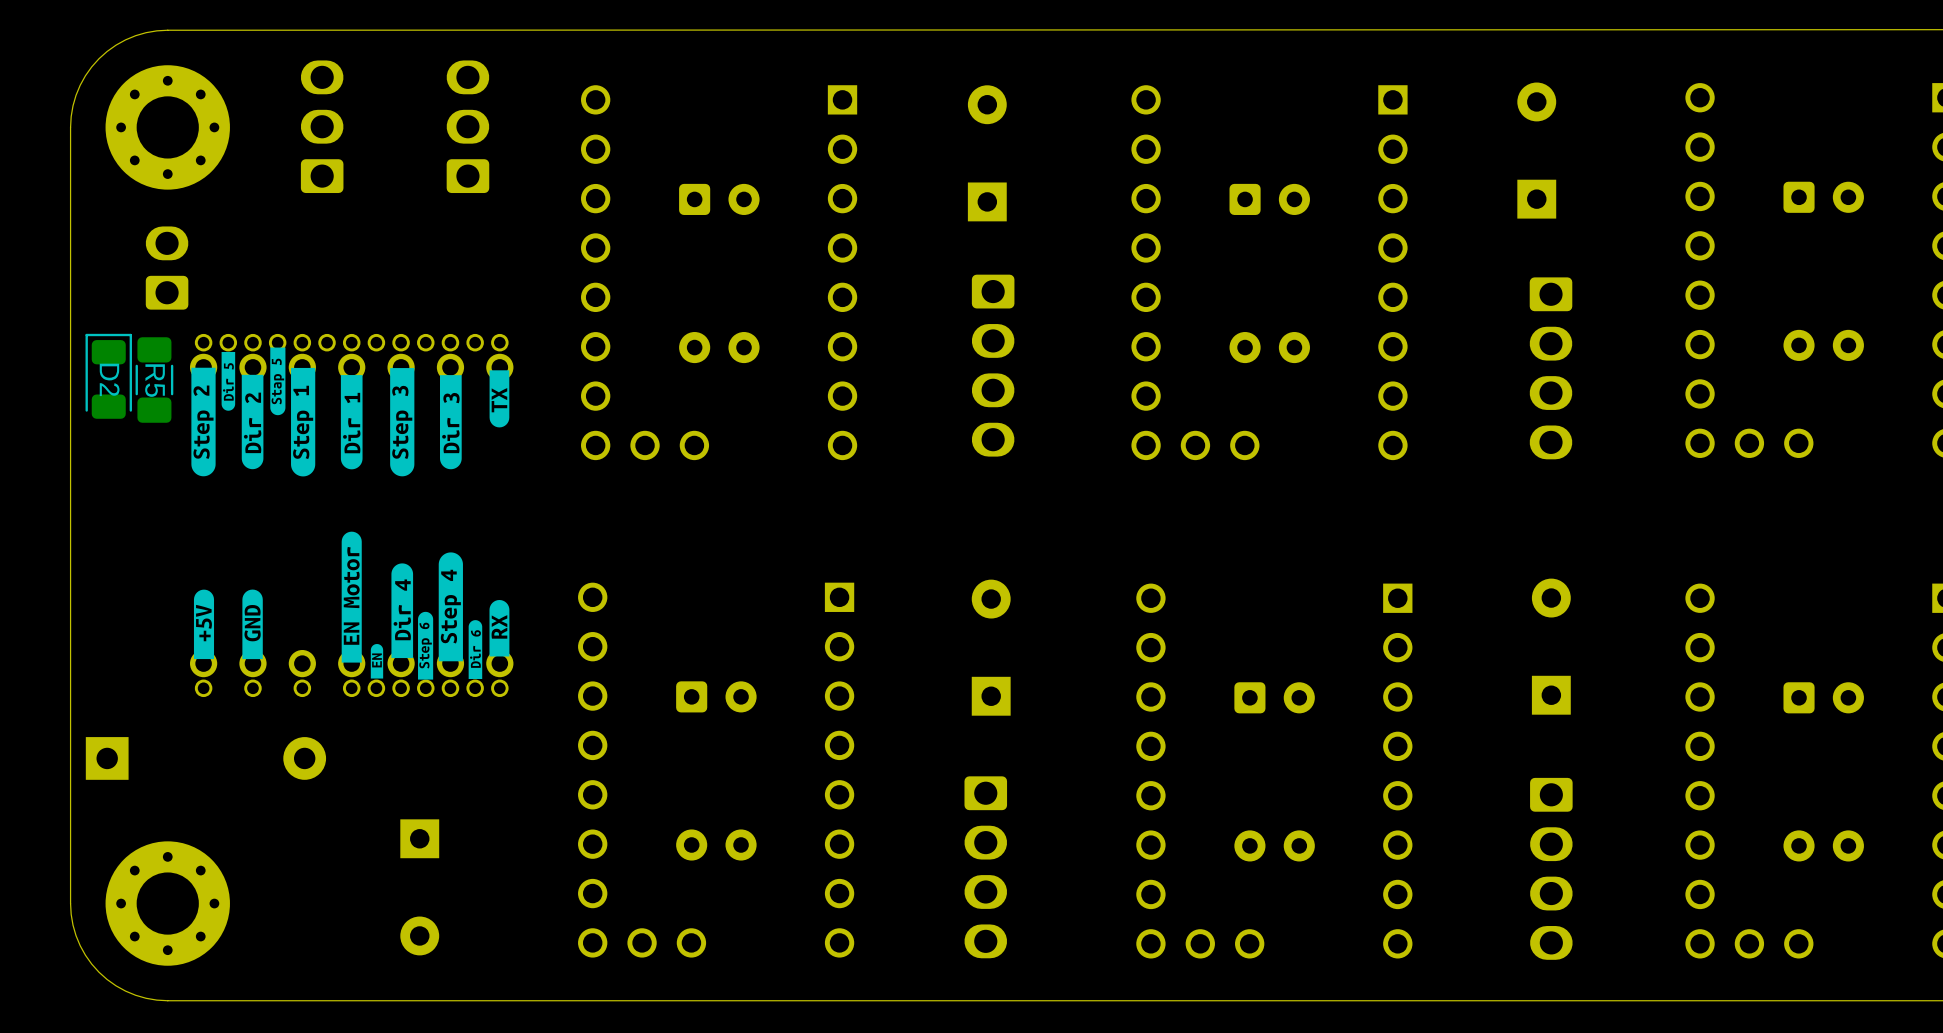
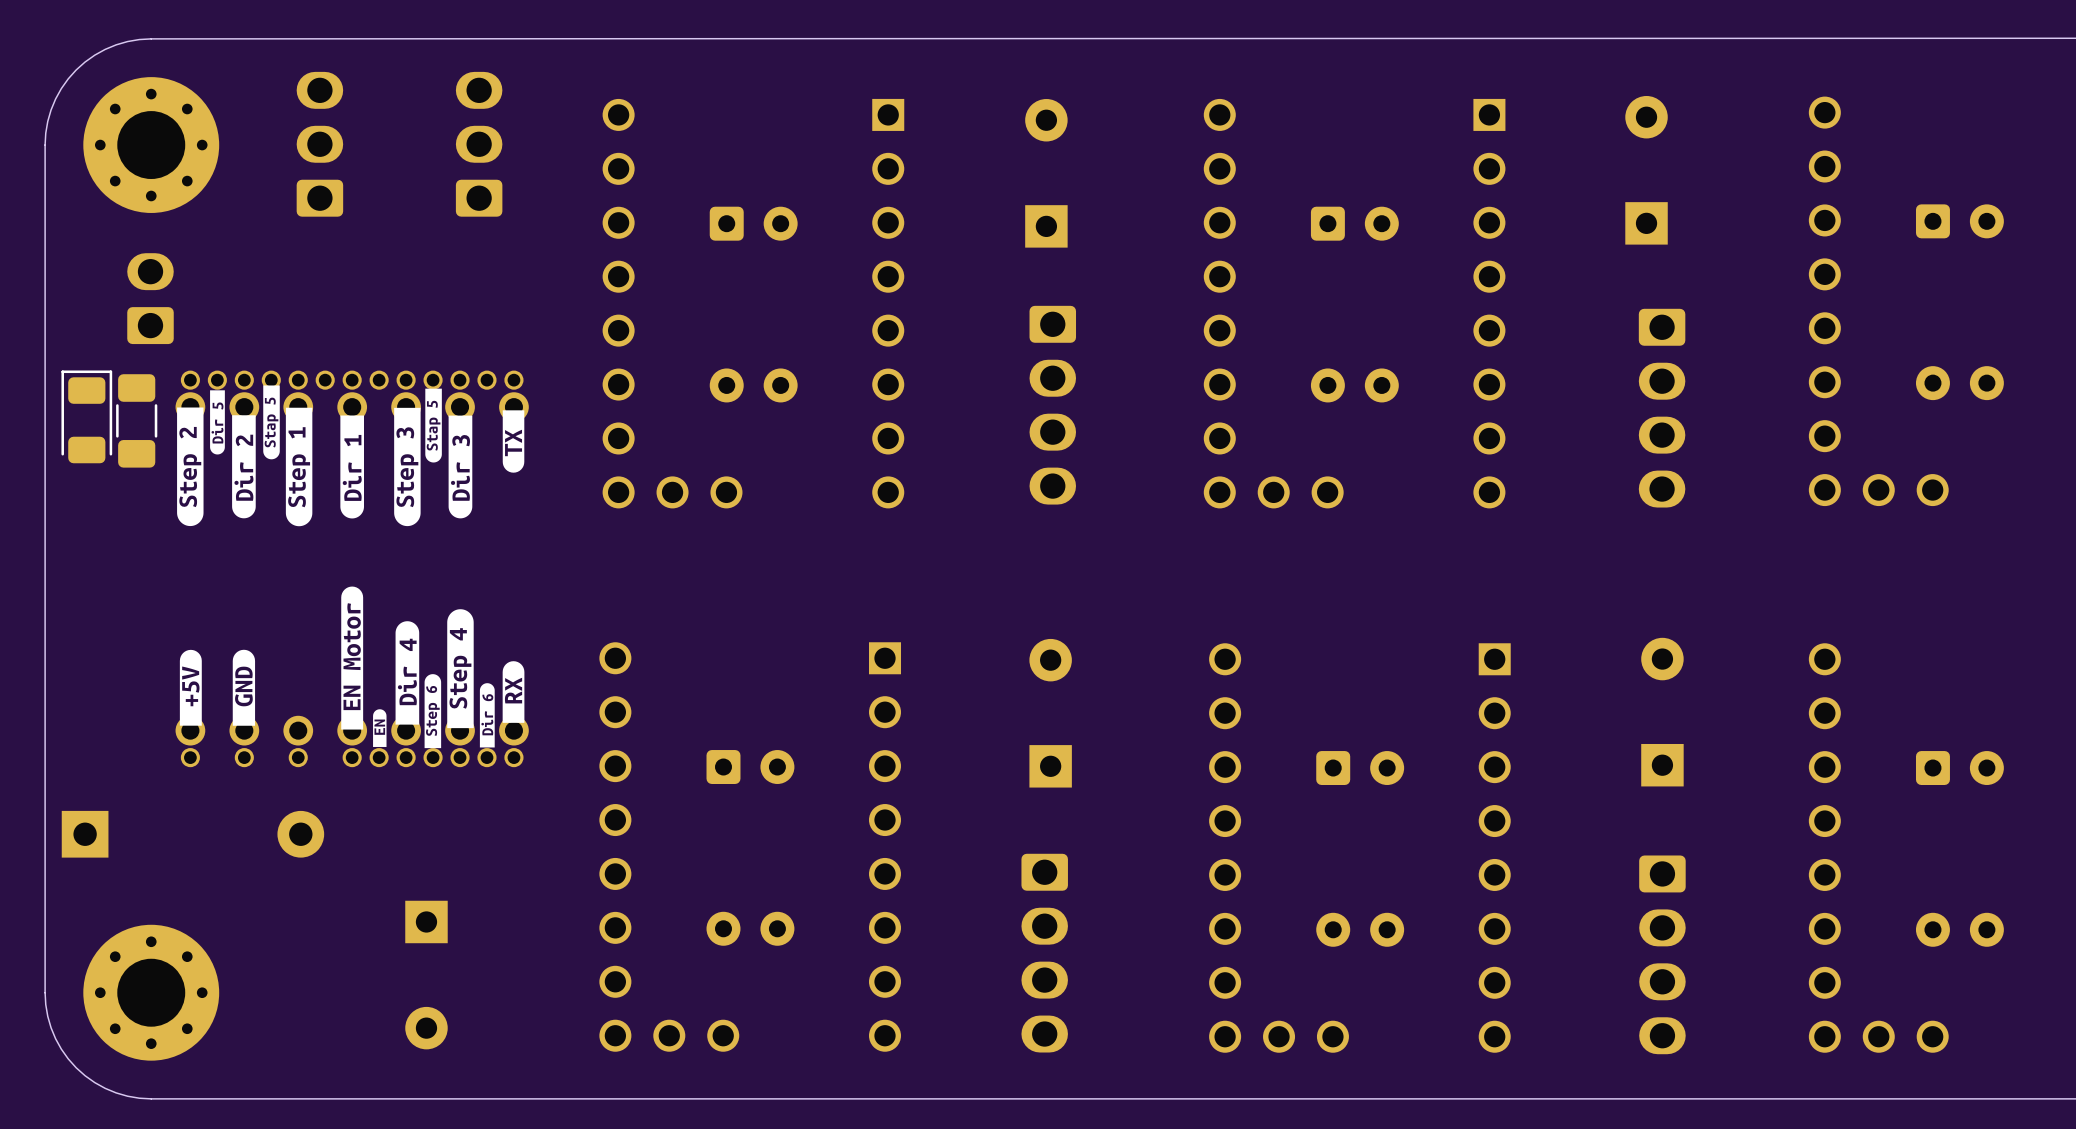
drawing: none -> [425, 388, 442, 463]
D2 name: D2 (109, 379) -> none
R5 name: R5 (155, 380) -> none

